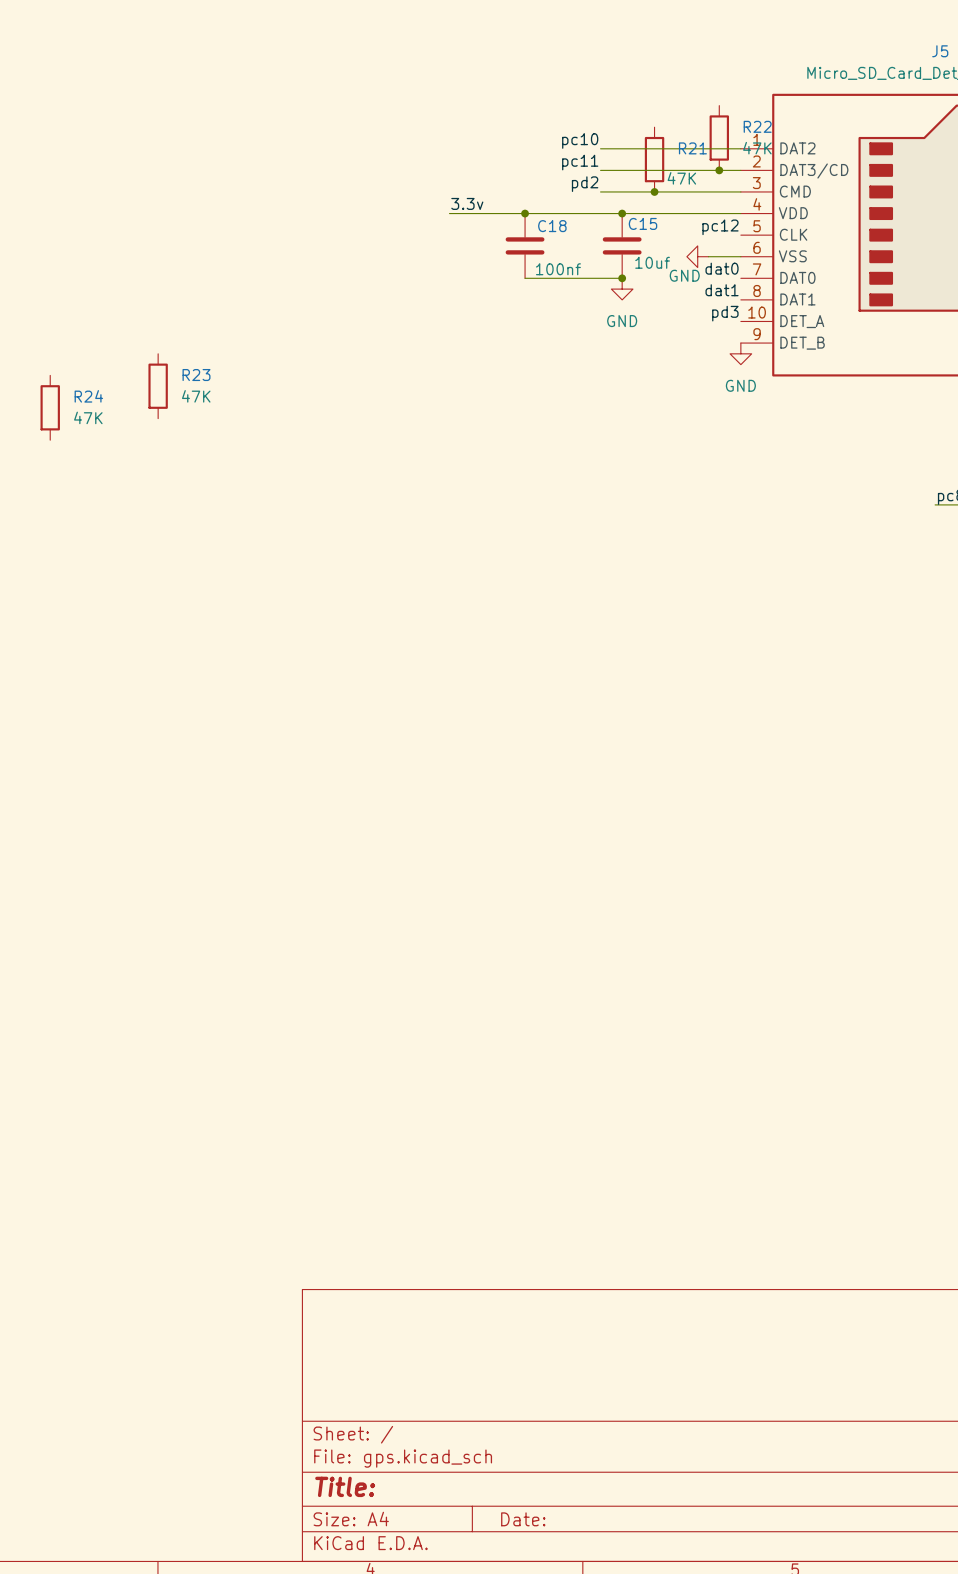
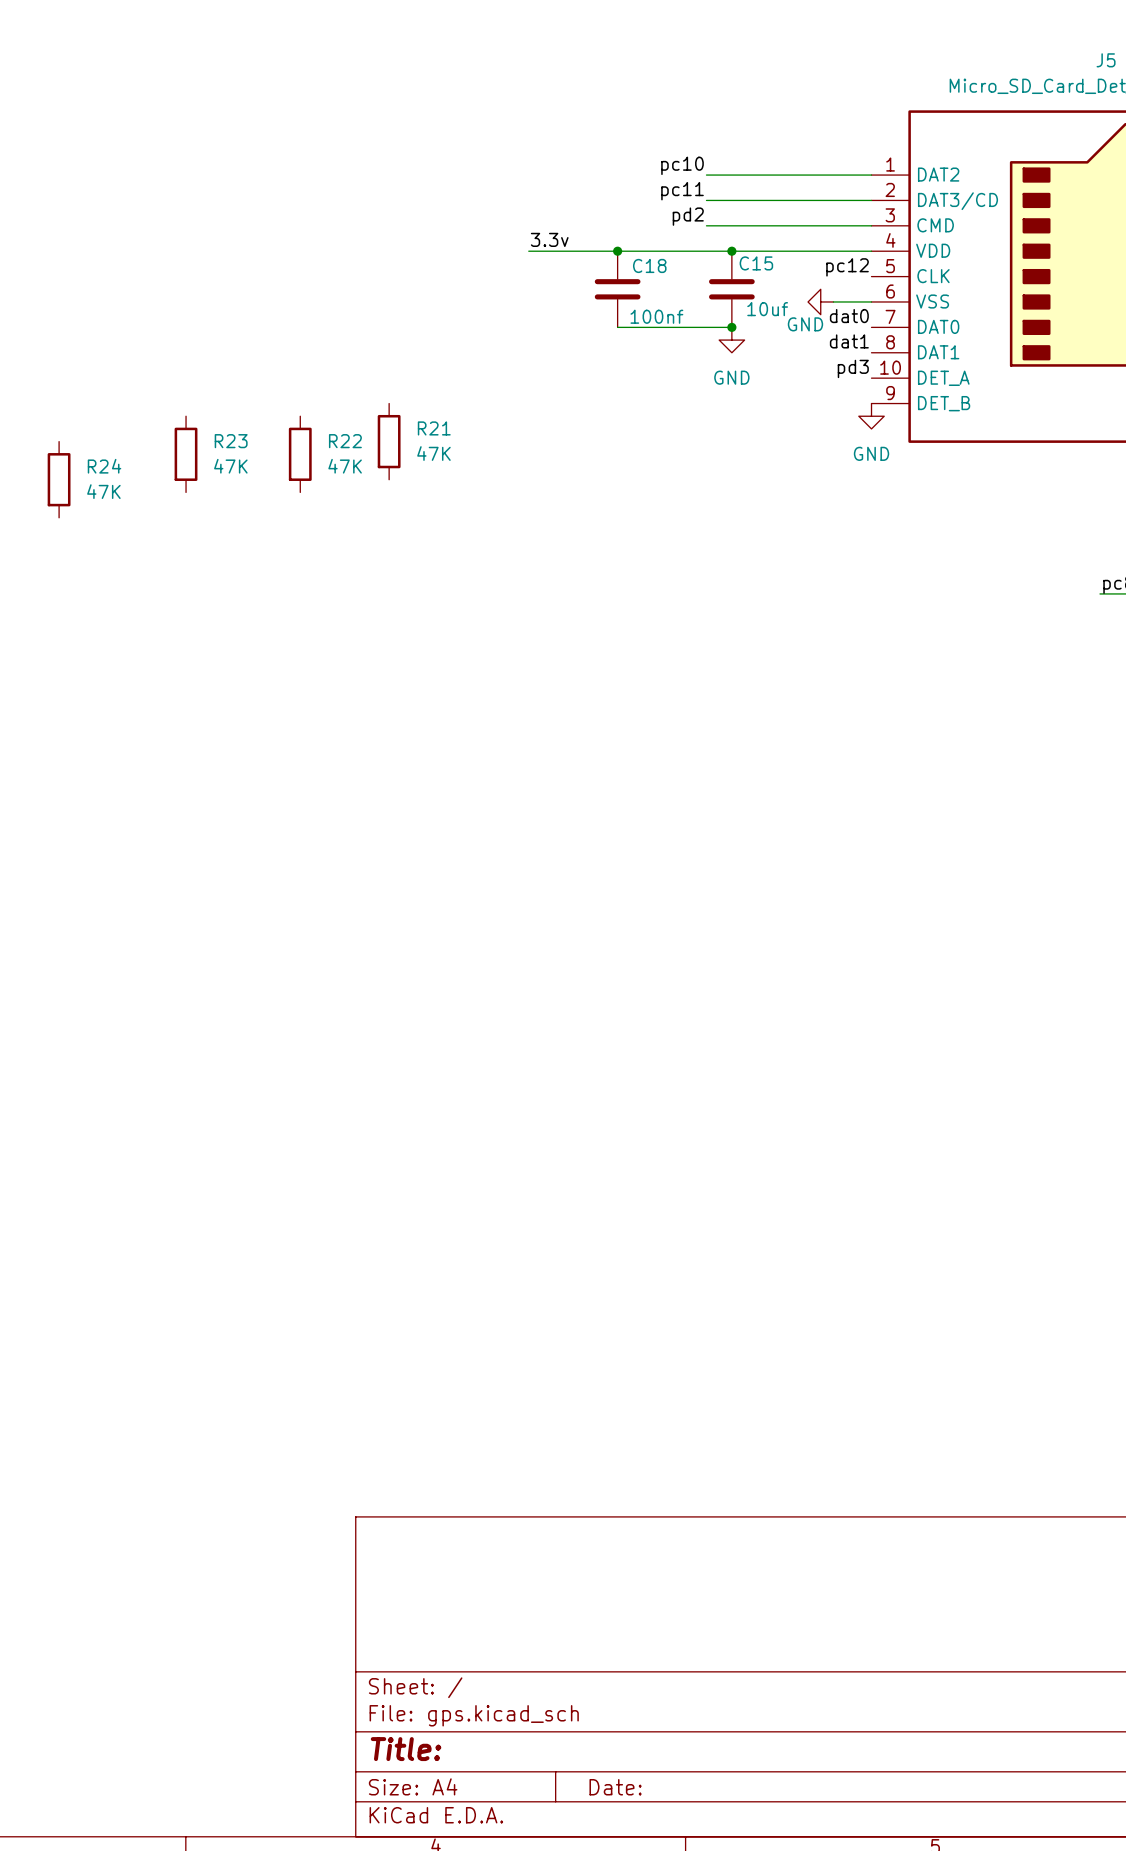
R22 position: (719, 138) -> (300, 454)
R21 position: (654, 159) -> (389, 441)
junction: (719, 170) -> none
R21 value position: 47K (681, 178) -> 47K (433, 453)
junction: (654, 191) -> none

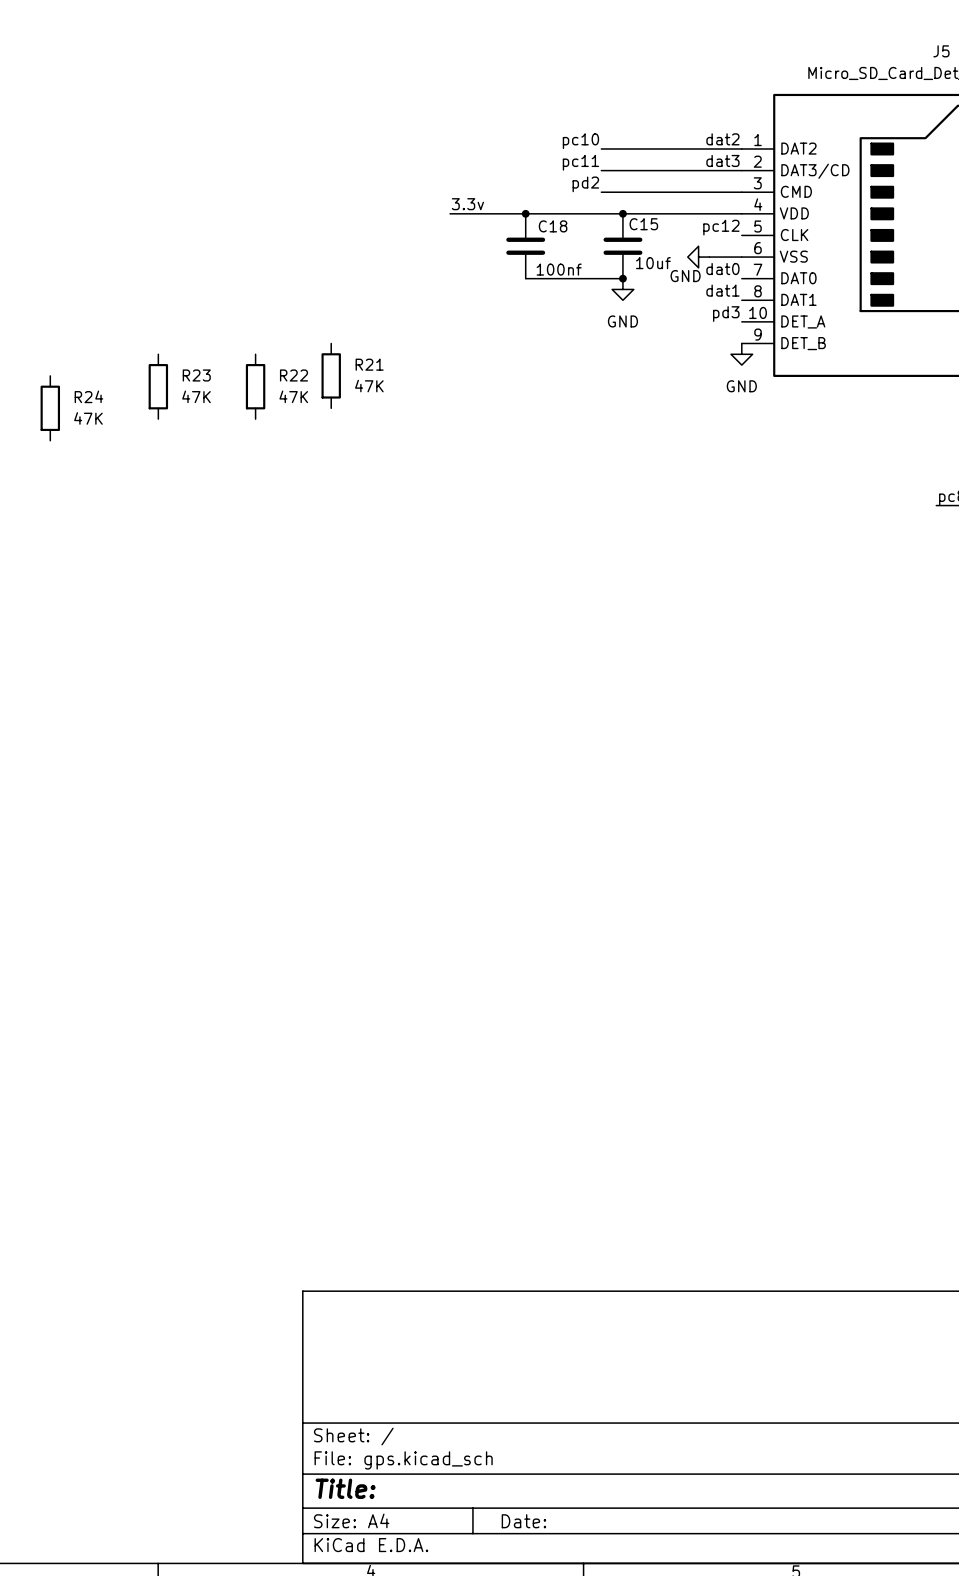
label: none -> dat2 (722, 139)
label: none -> dat3 (722, 160)

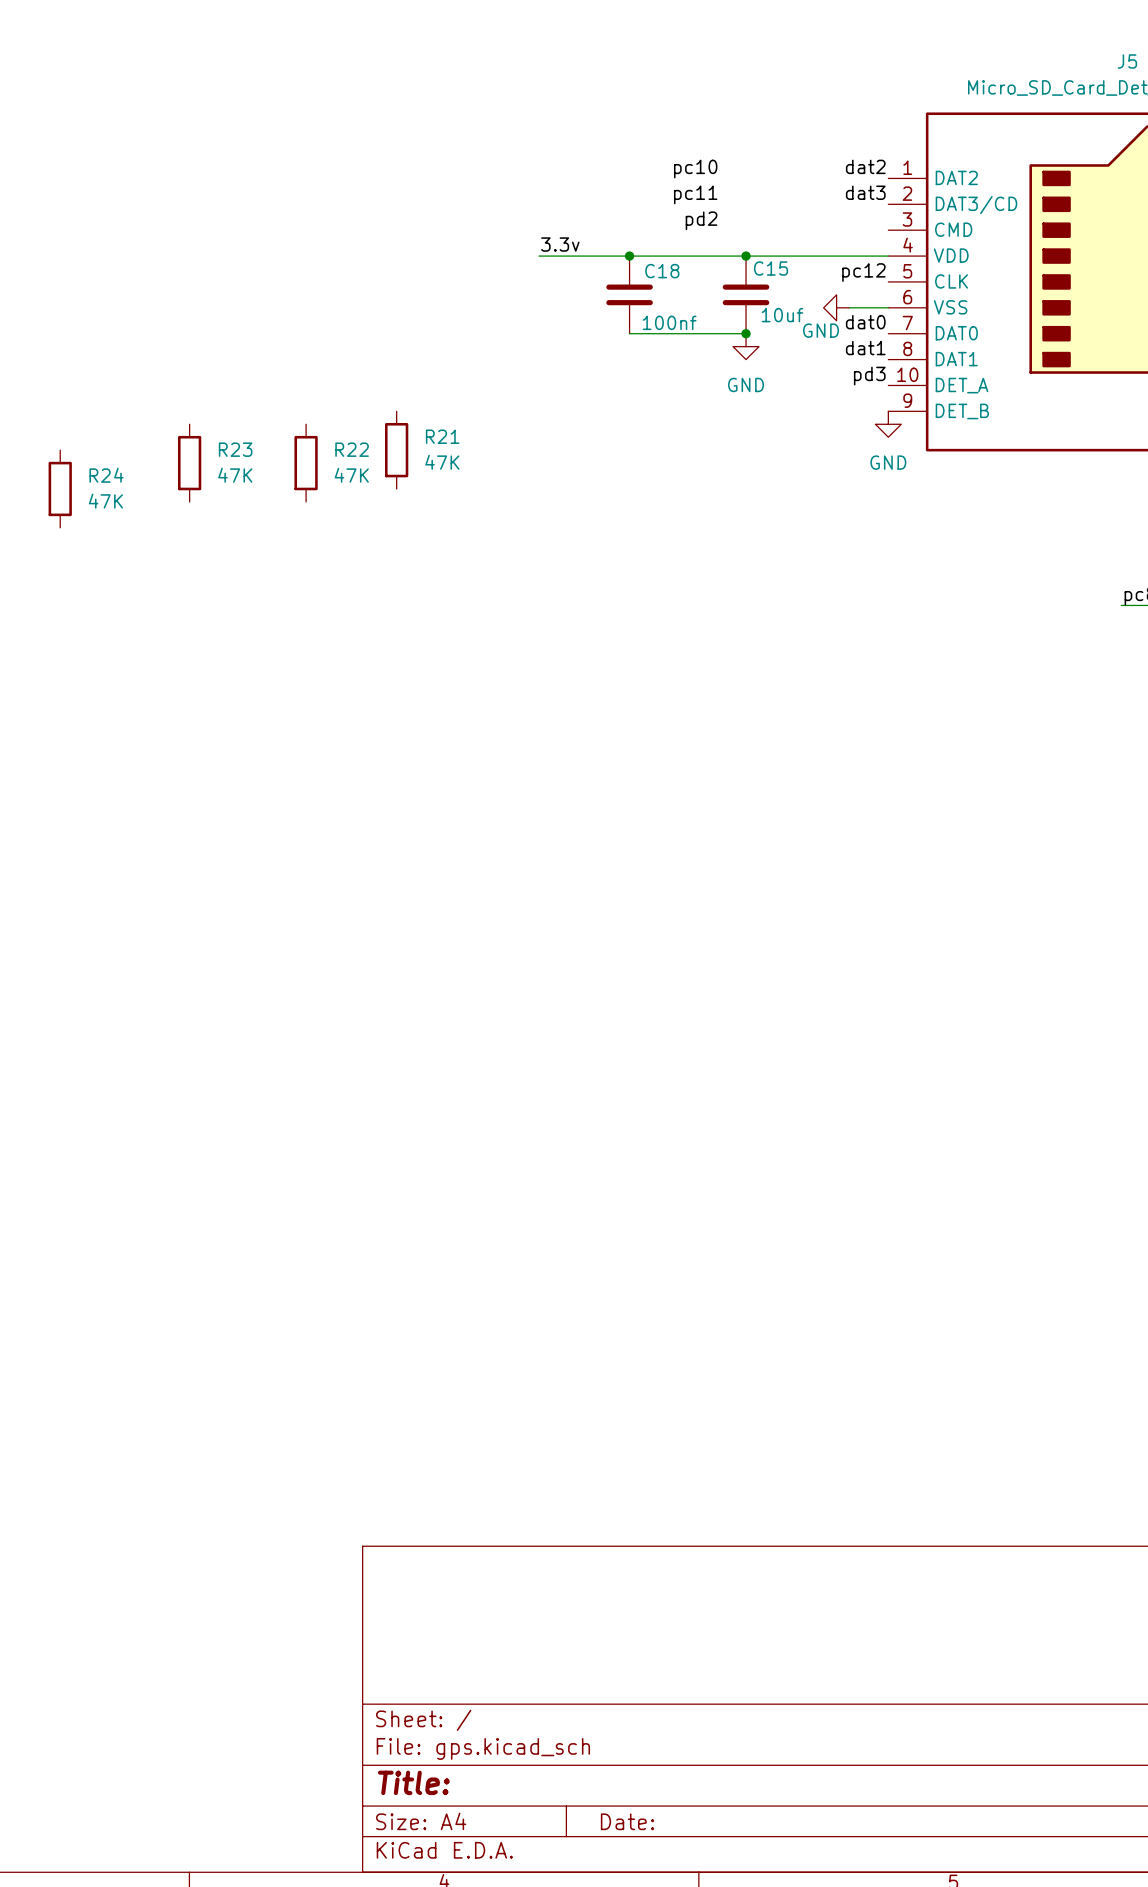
wire: (601, 148) (741, 148) -> none
wire: (601, 170) (741, 170) -> none
wire: (601, 192) (741, 192) -> none

